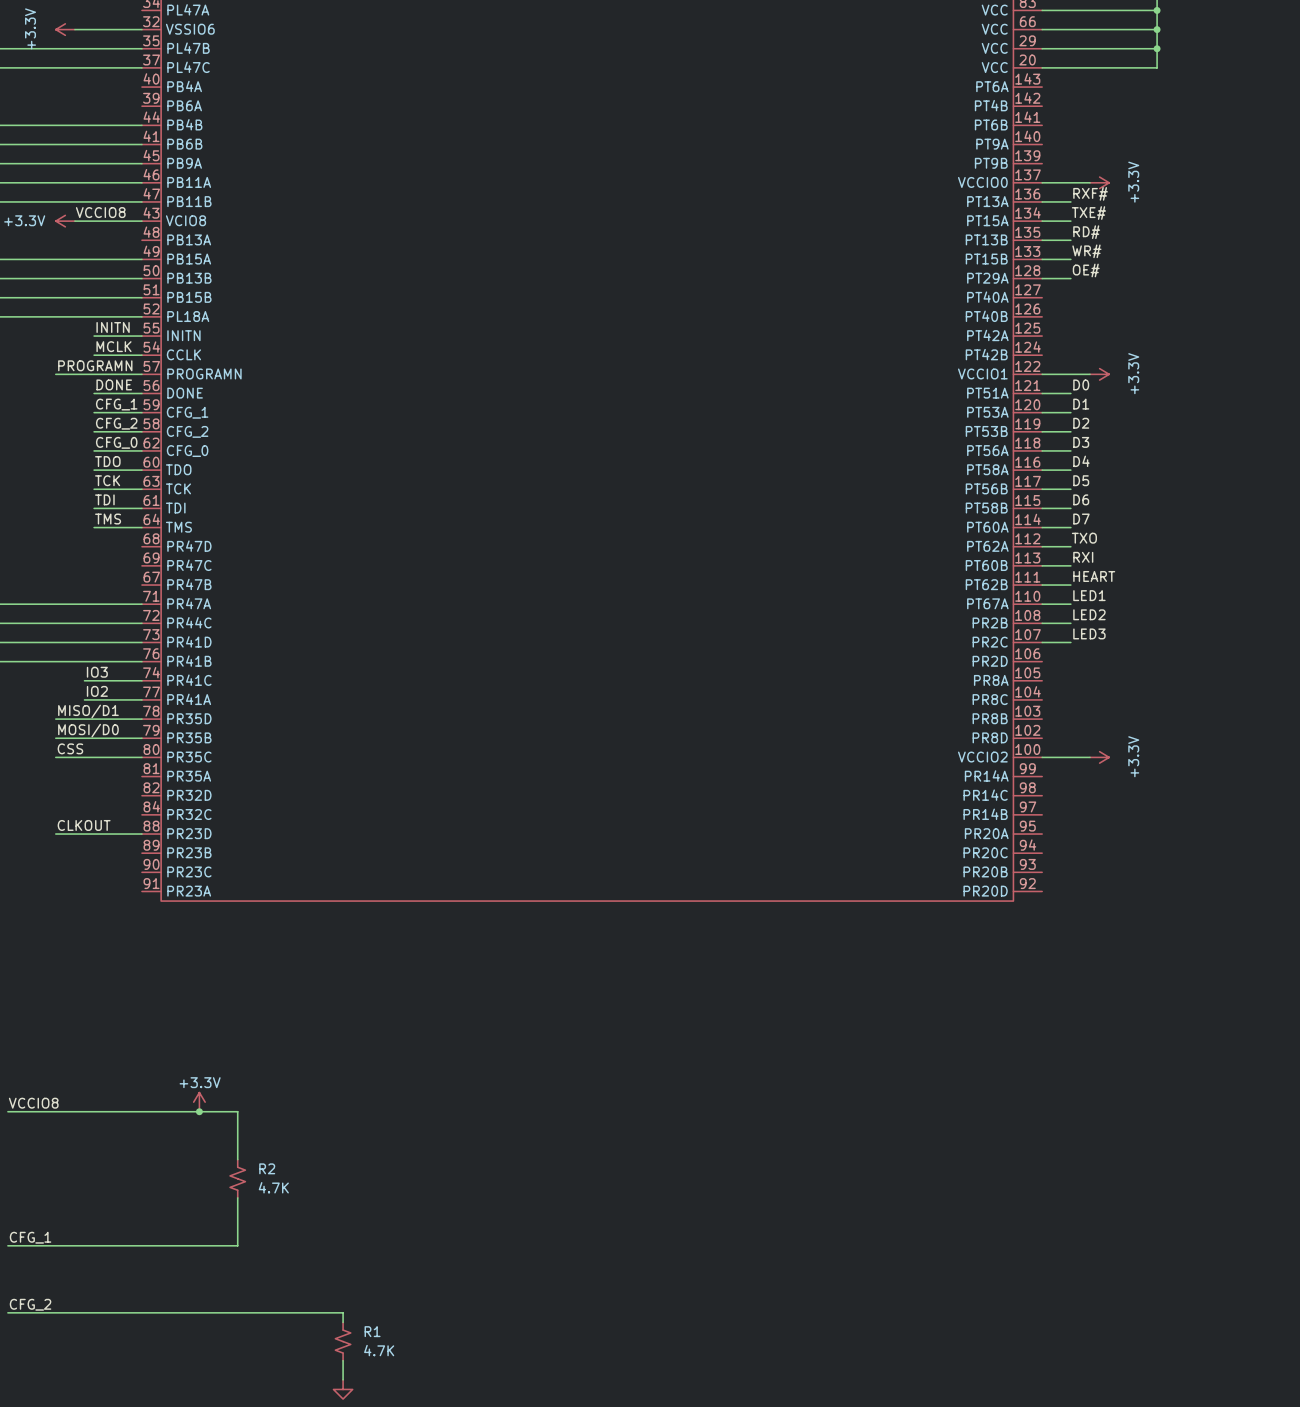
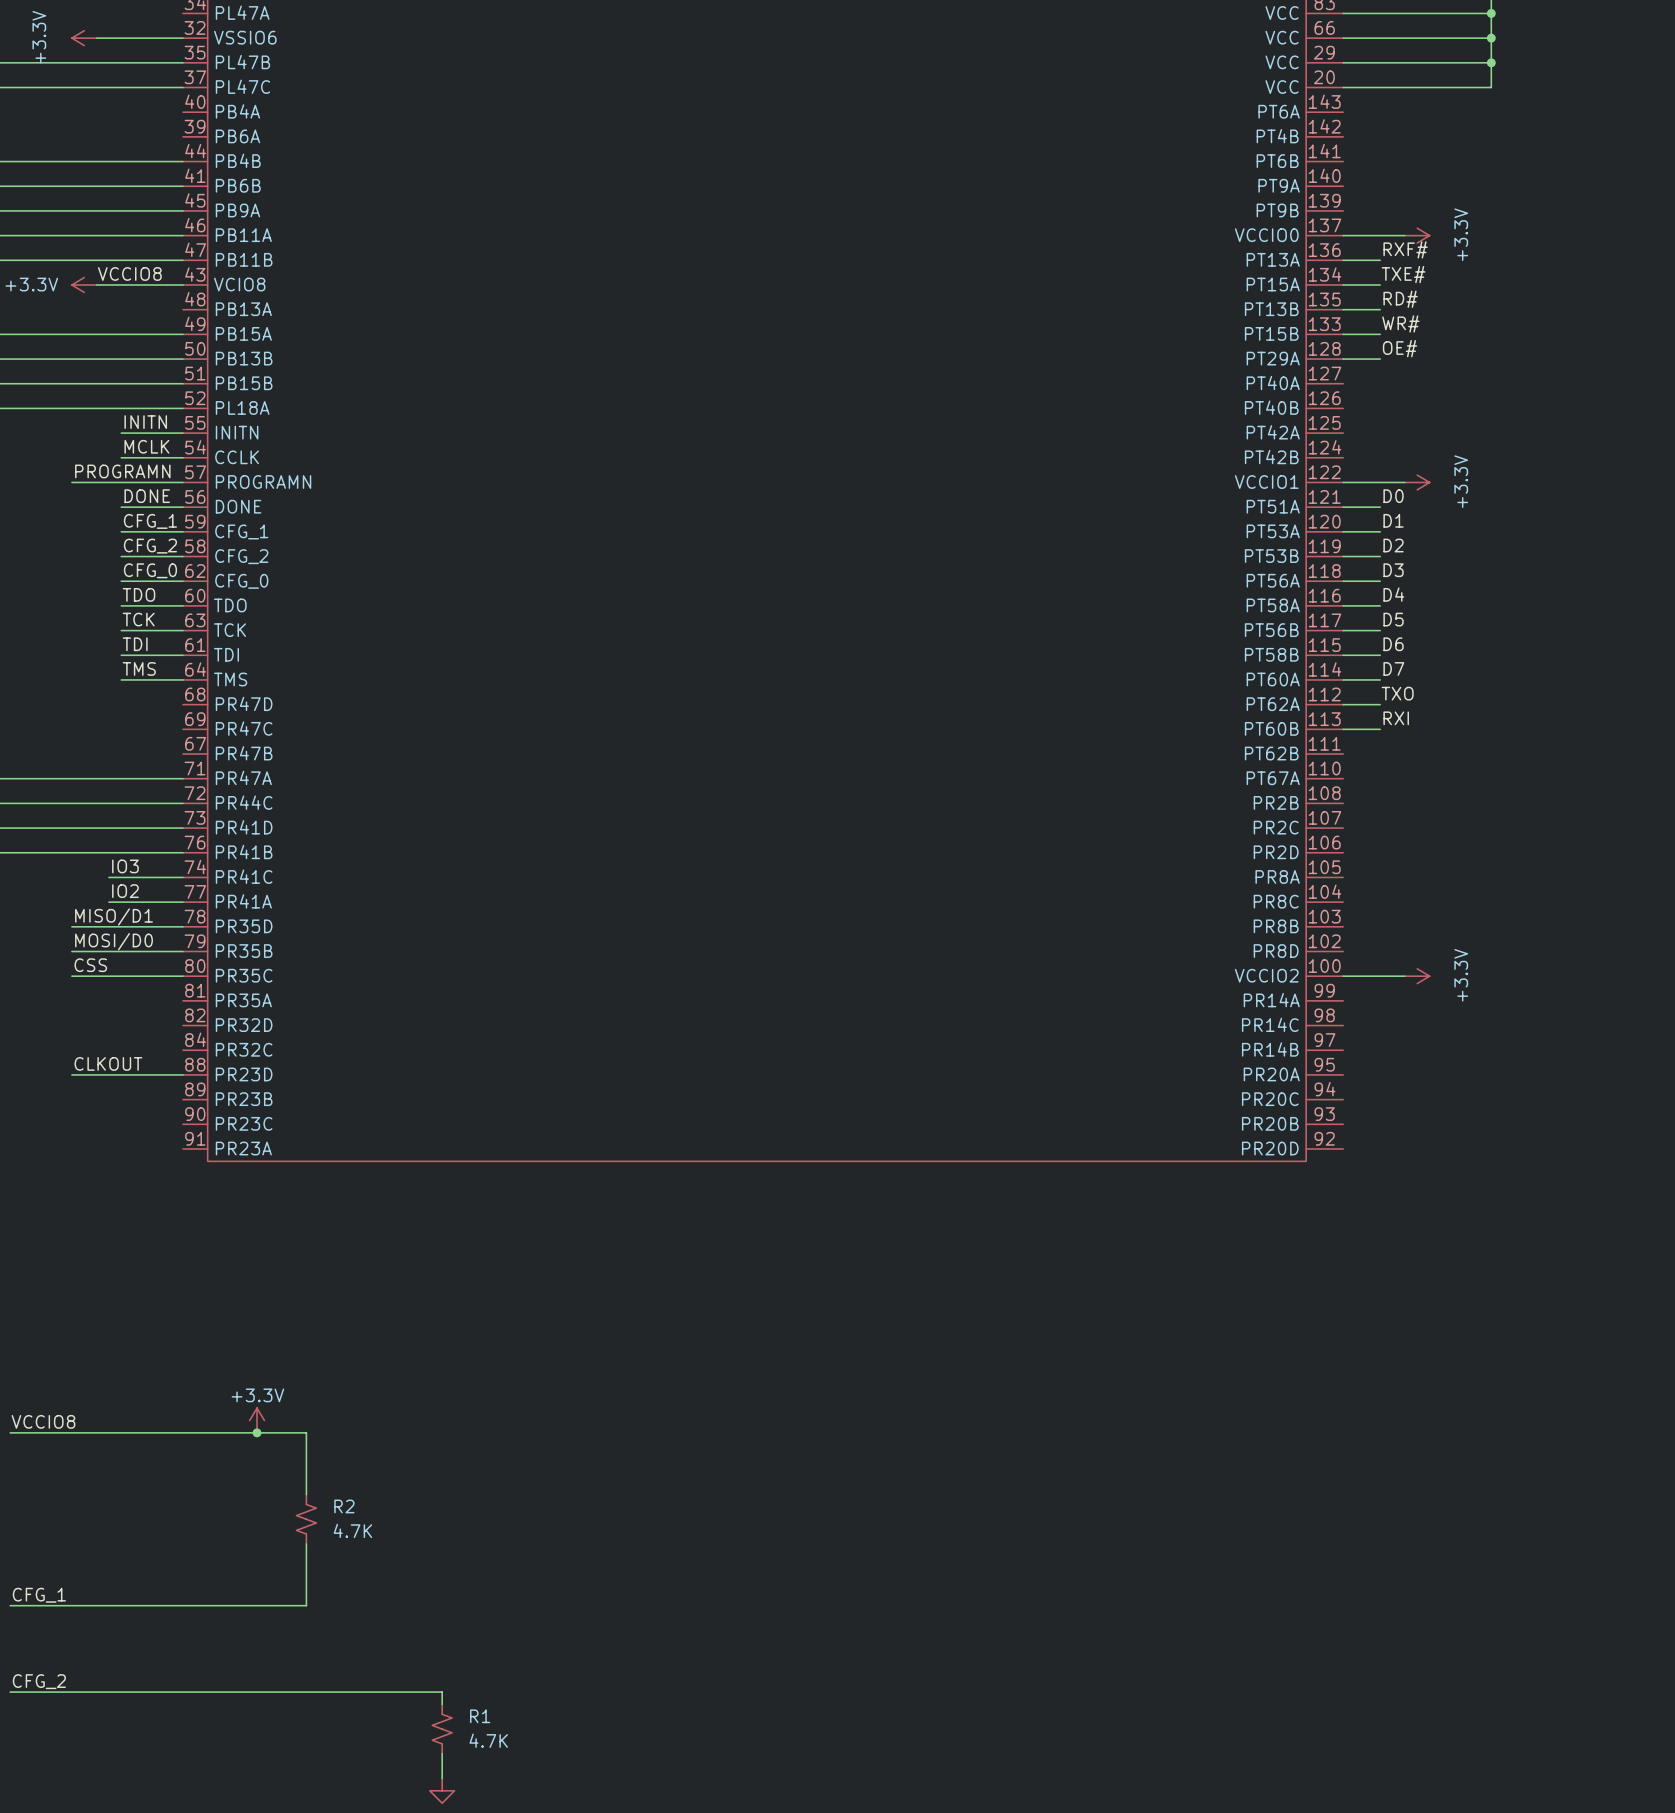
label: HEART (1094, 576) -> none
wire: (1042, 585) (1070, 585) -> none
label: LED1 (1089, 595) -> none
wire: (1042, 604) (1070, 604) -> none
label: LED2 (1089, 614) -> none
wire: (1042, 623) (1070, 623) -> none
label: LED3 (1089, 633) -> none
wire: (1042, 642) (1070, 642) -> none

